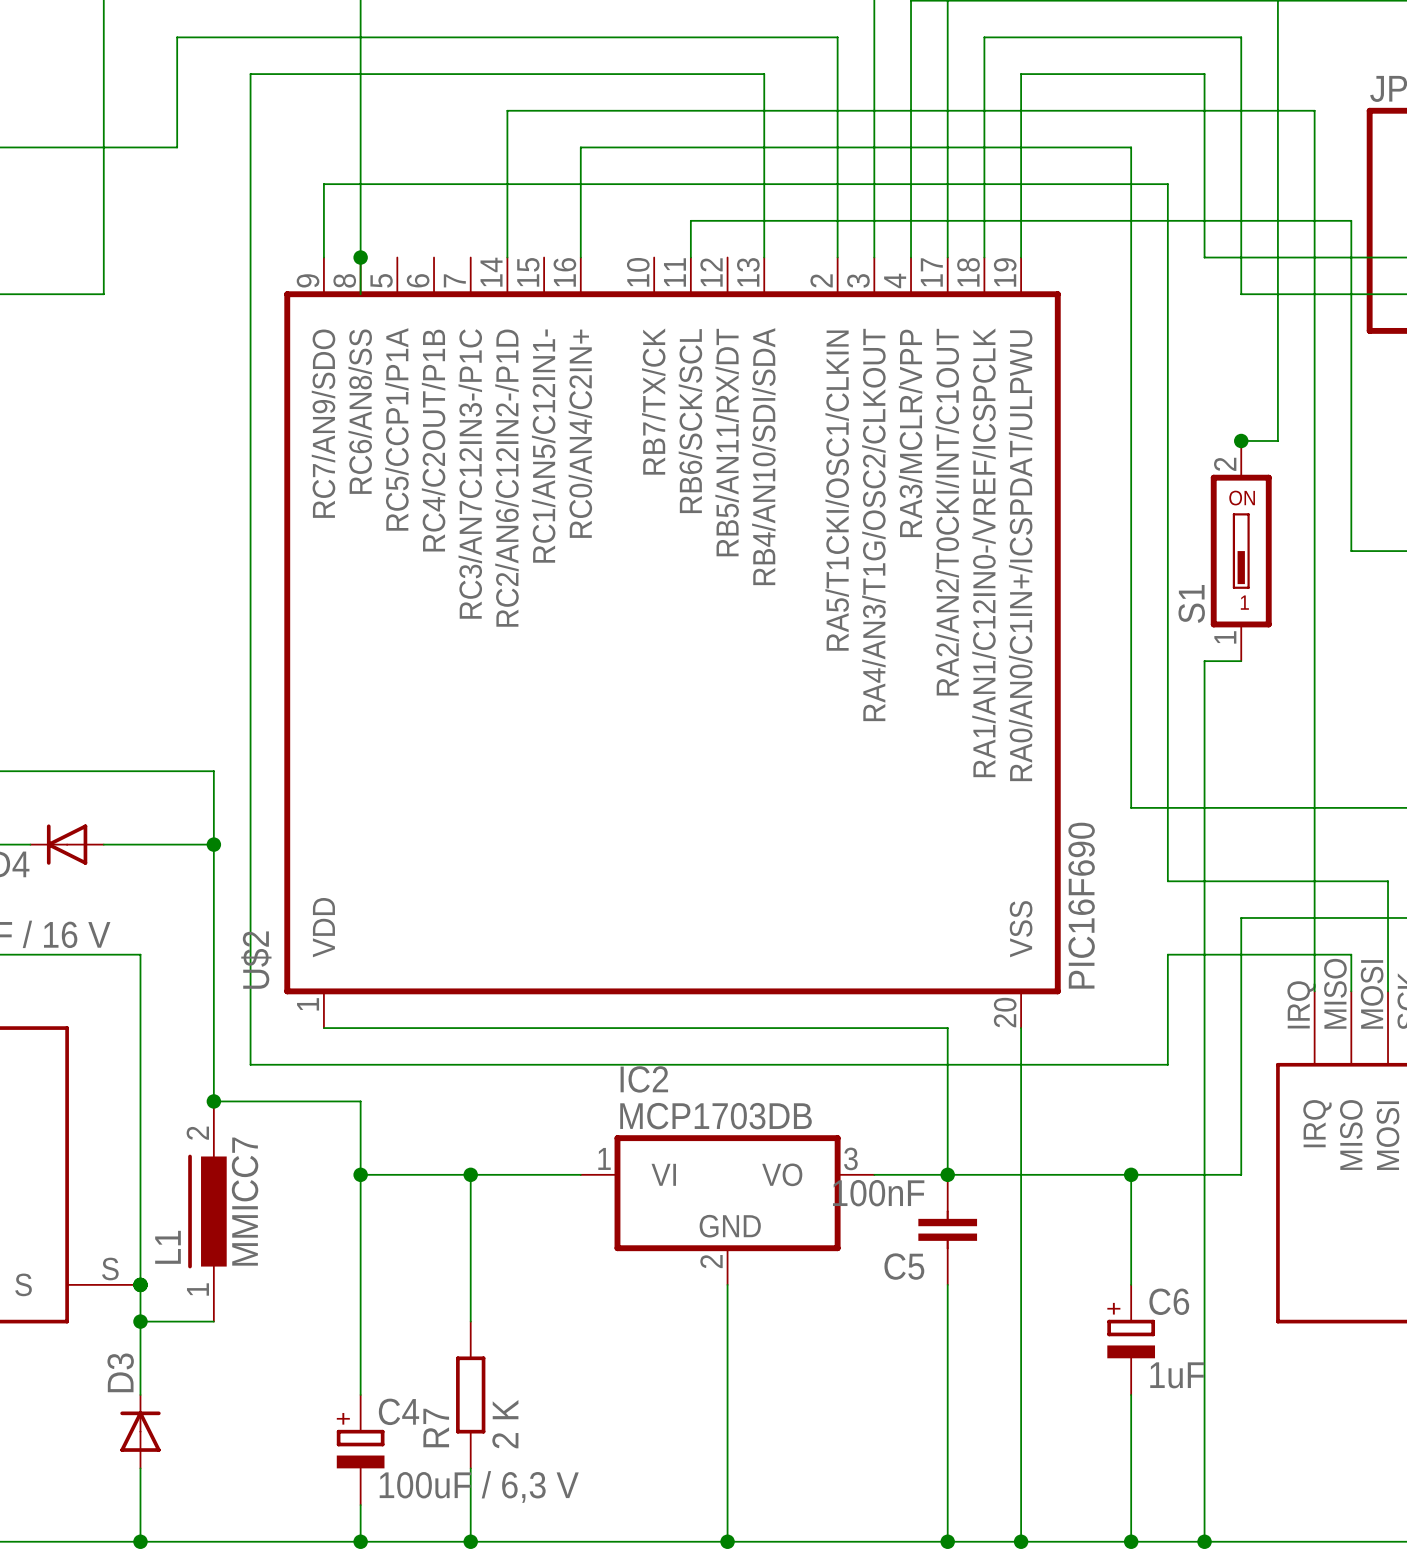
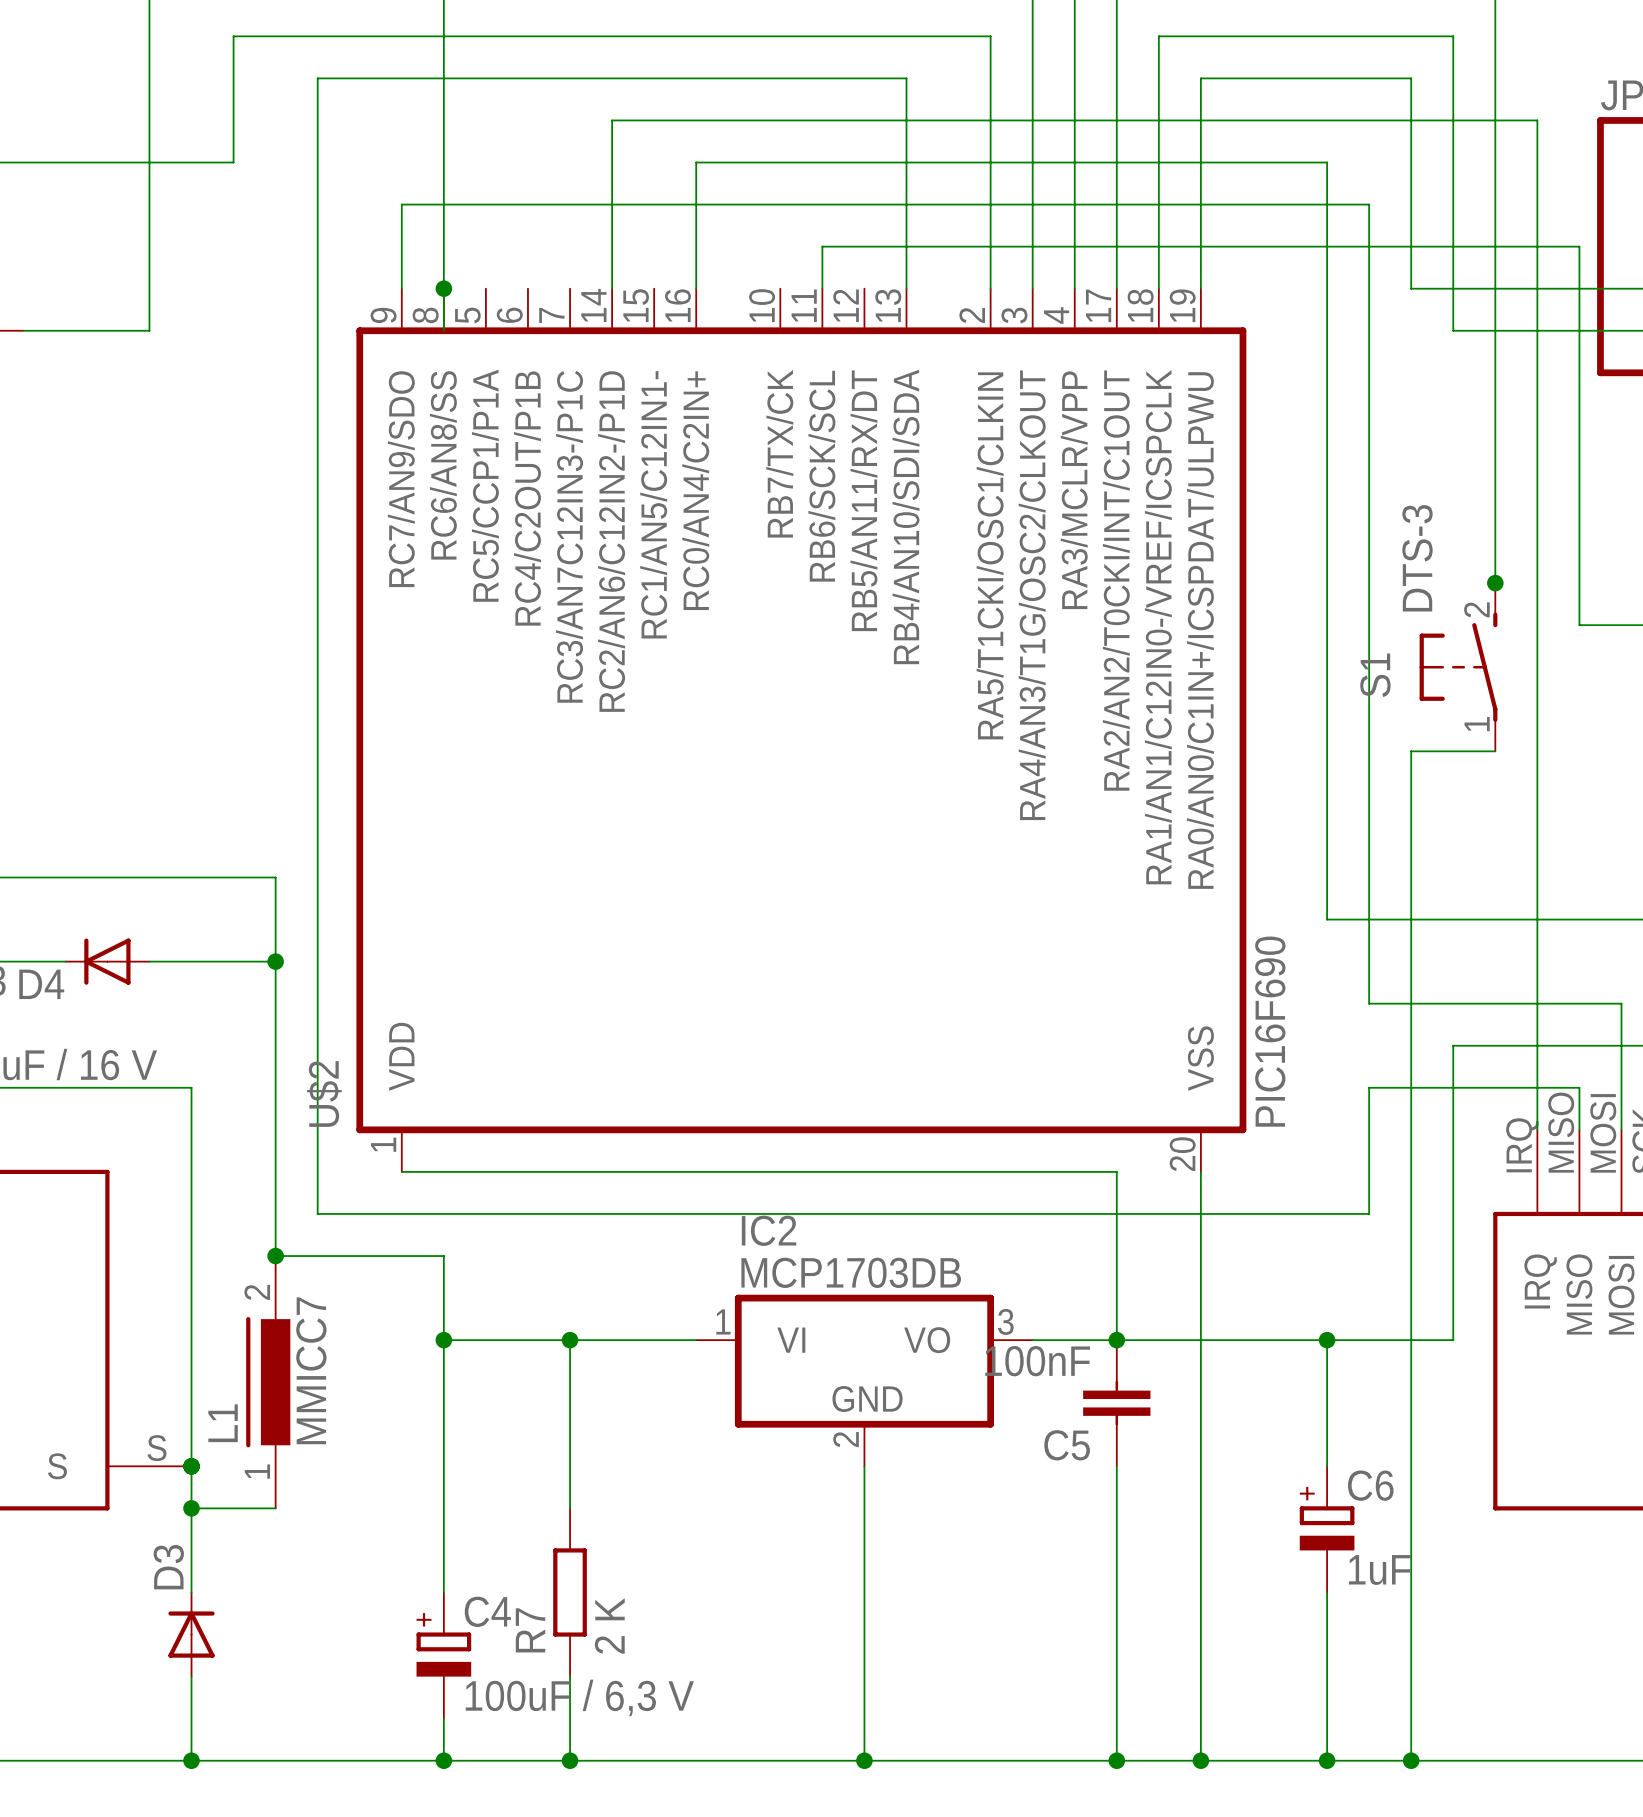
S1 symbol: [1210, 440, 1272, 662] -> [1419, 583, 1498, 752]
wire: (1241, 440) (1277, 440) -> (1495, 583) (1495, 498)
junction position: (1241, 440) -> (1495, 583)
S1 value: none -> DTS-3 (1417, 558)
S1 name position: S1 (1191, 603) -> S1 (1375, 675)
wire: none -> (1453, 751) (1495, 751)

